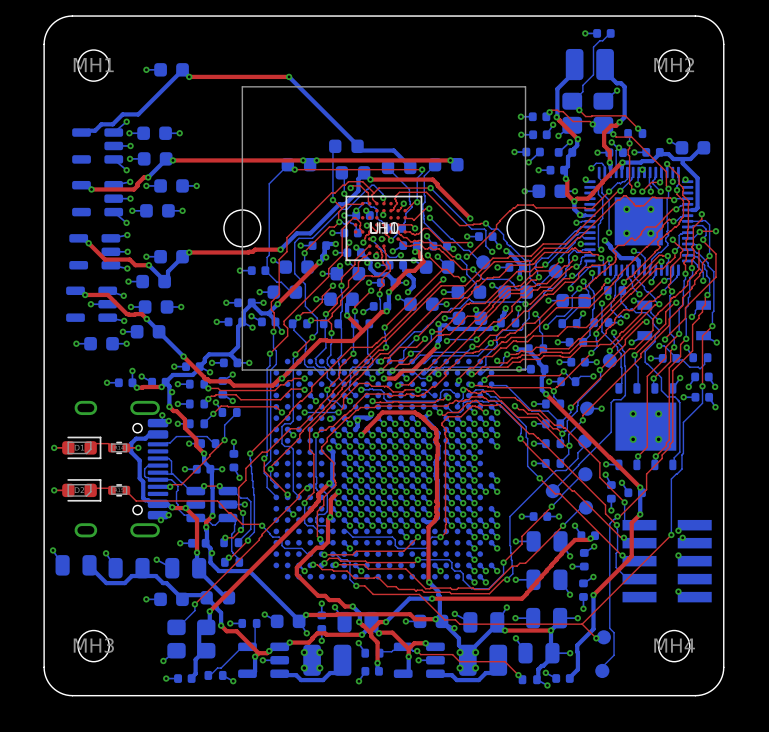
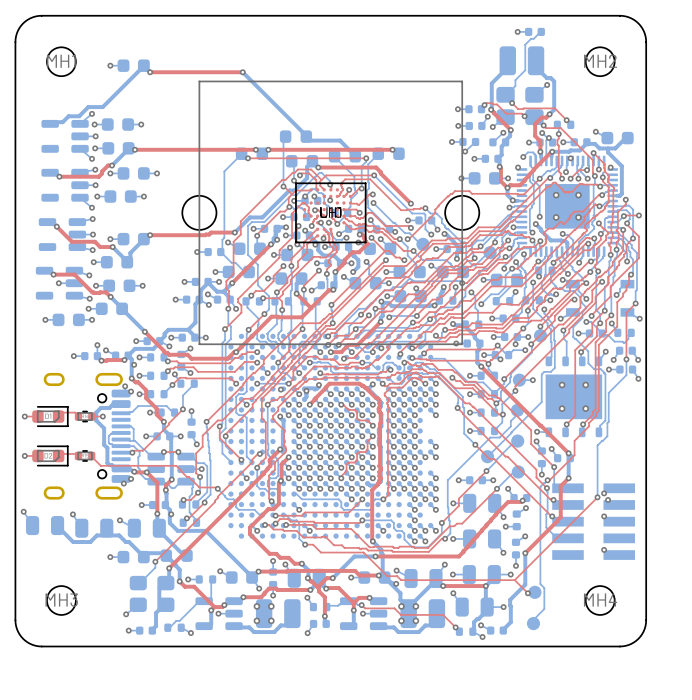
bottom track: none -> (366, 261) (369, 265) (369, 274) (375, 282)
via: none -> (366, 261)
via: none -> (515, 344)
via: none -> (500, 359)
top track: none -> (341, 404) (349, 409) (355, 409) (358, 419) (367, 420) (372, 425)
top track: none -> (372, 436) (367, 441) (366, 450) (358, 452) (356, 461) (346, 464) (346, 470) (341, 478)

